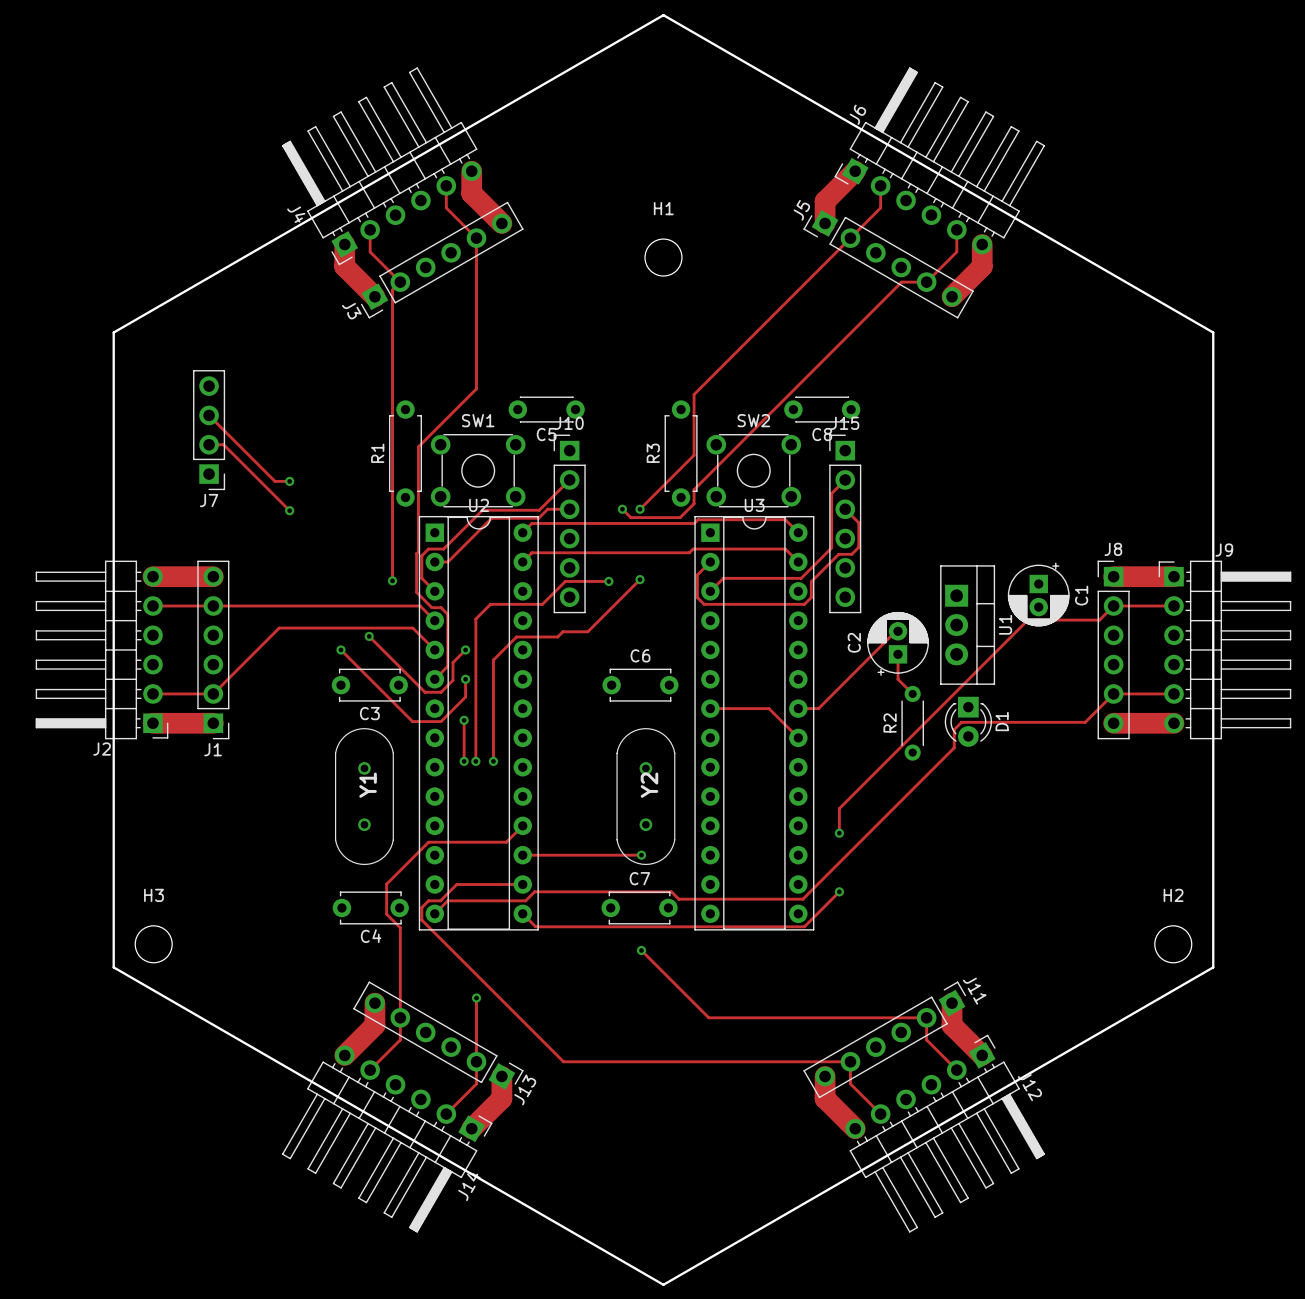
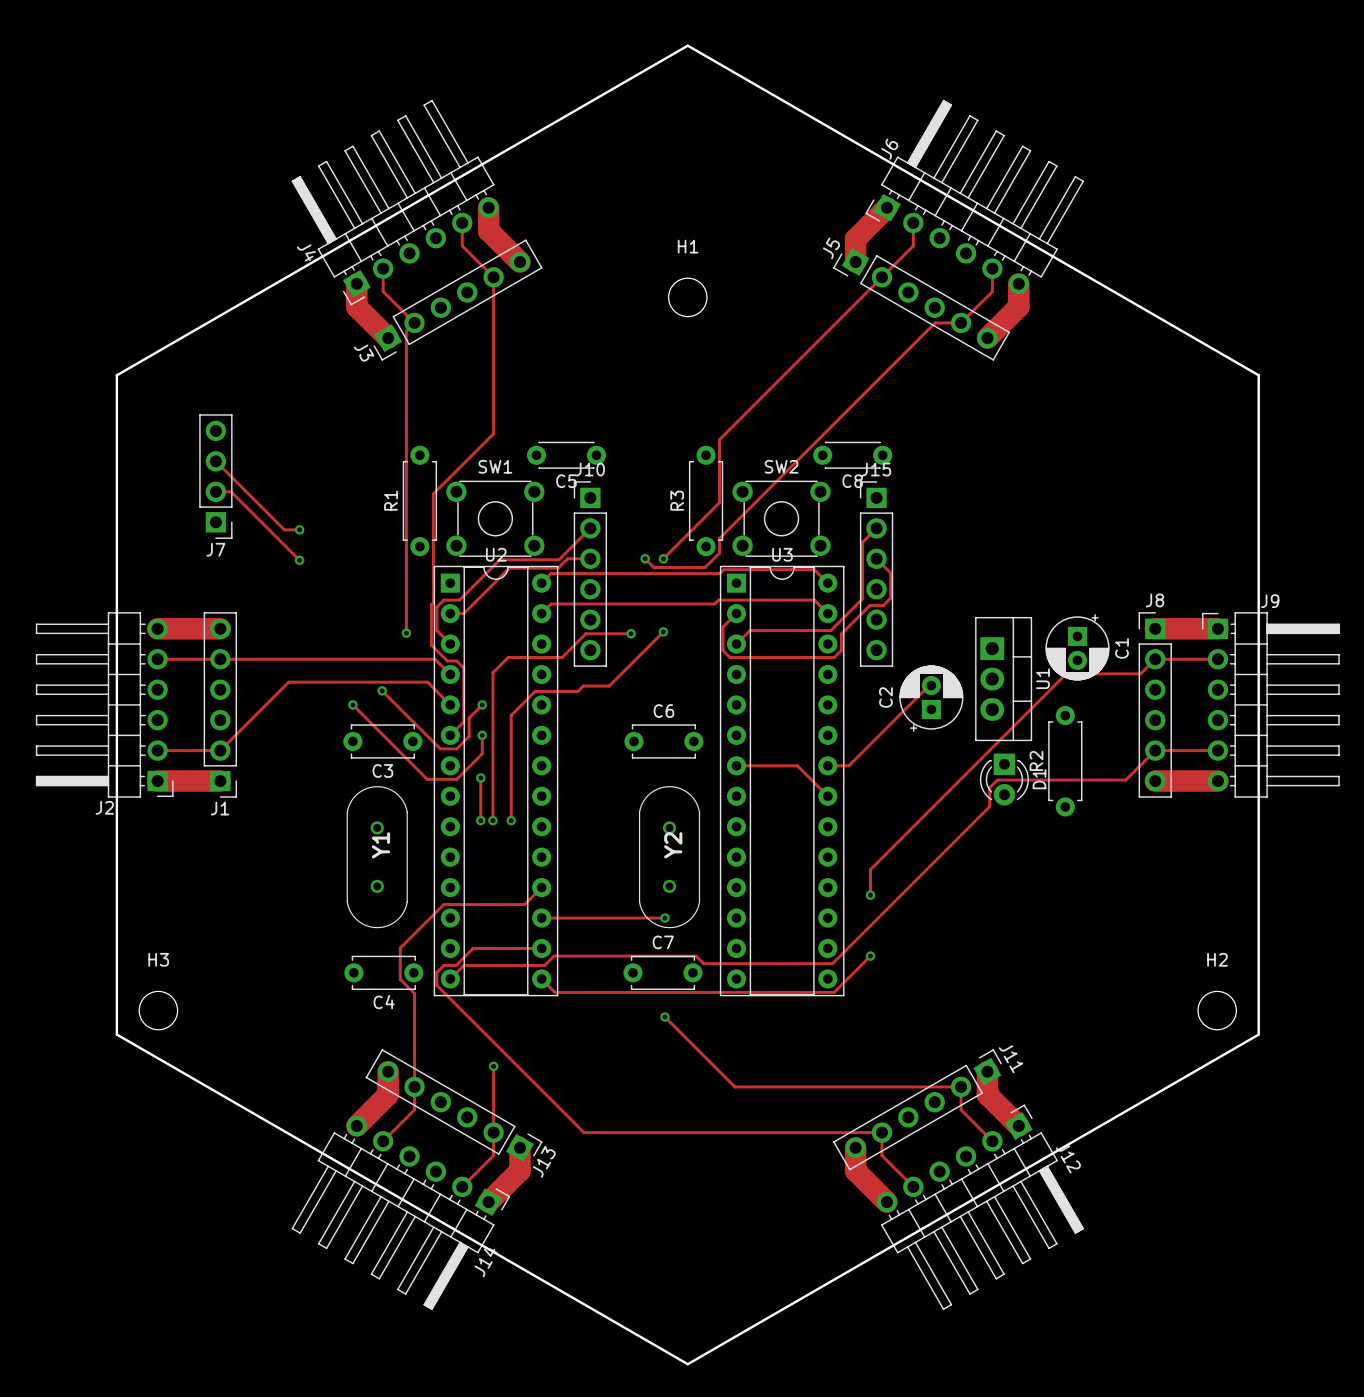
track: (898, 654) (898, 679) (912, 693) -> none
R2 footprint: [901, 685, 924, 761] -> [1048, 706, 1083, 817]

